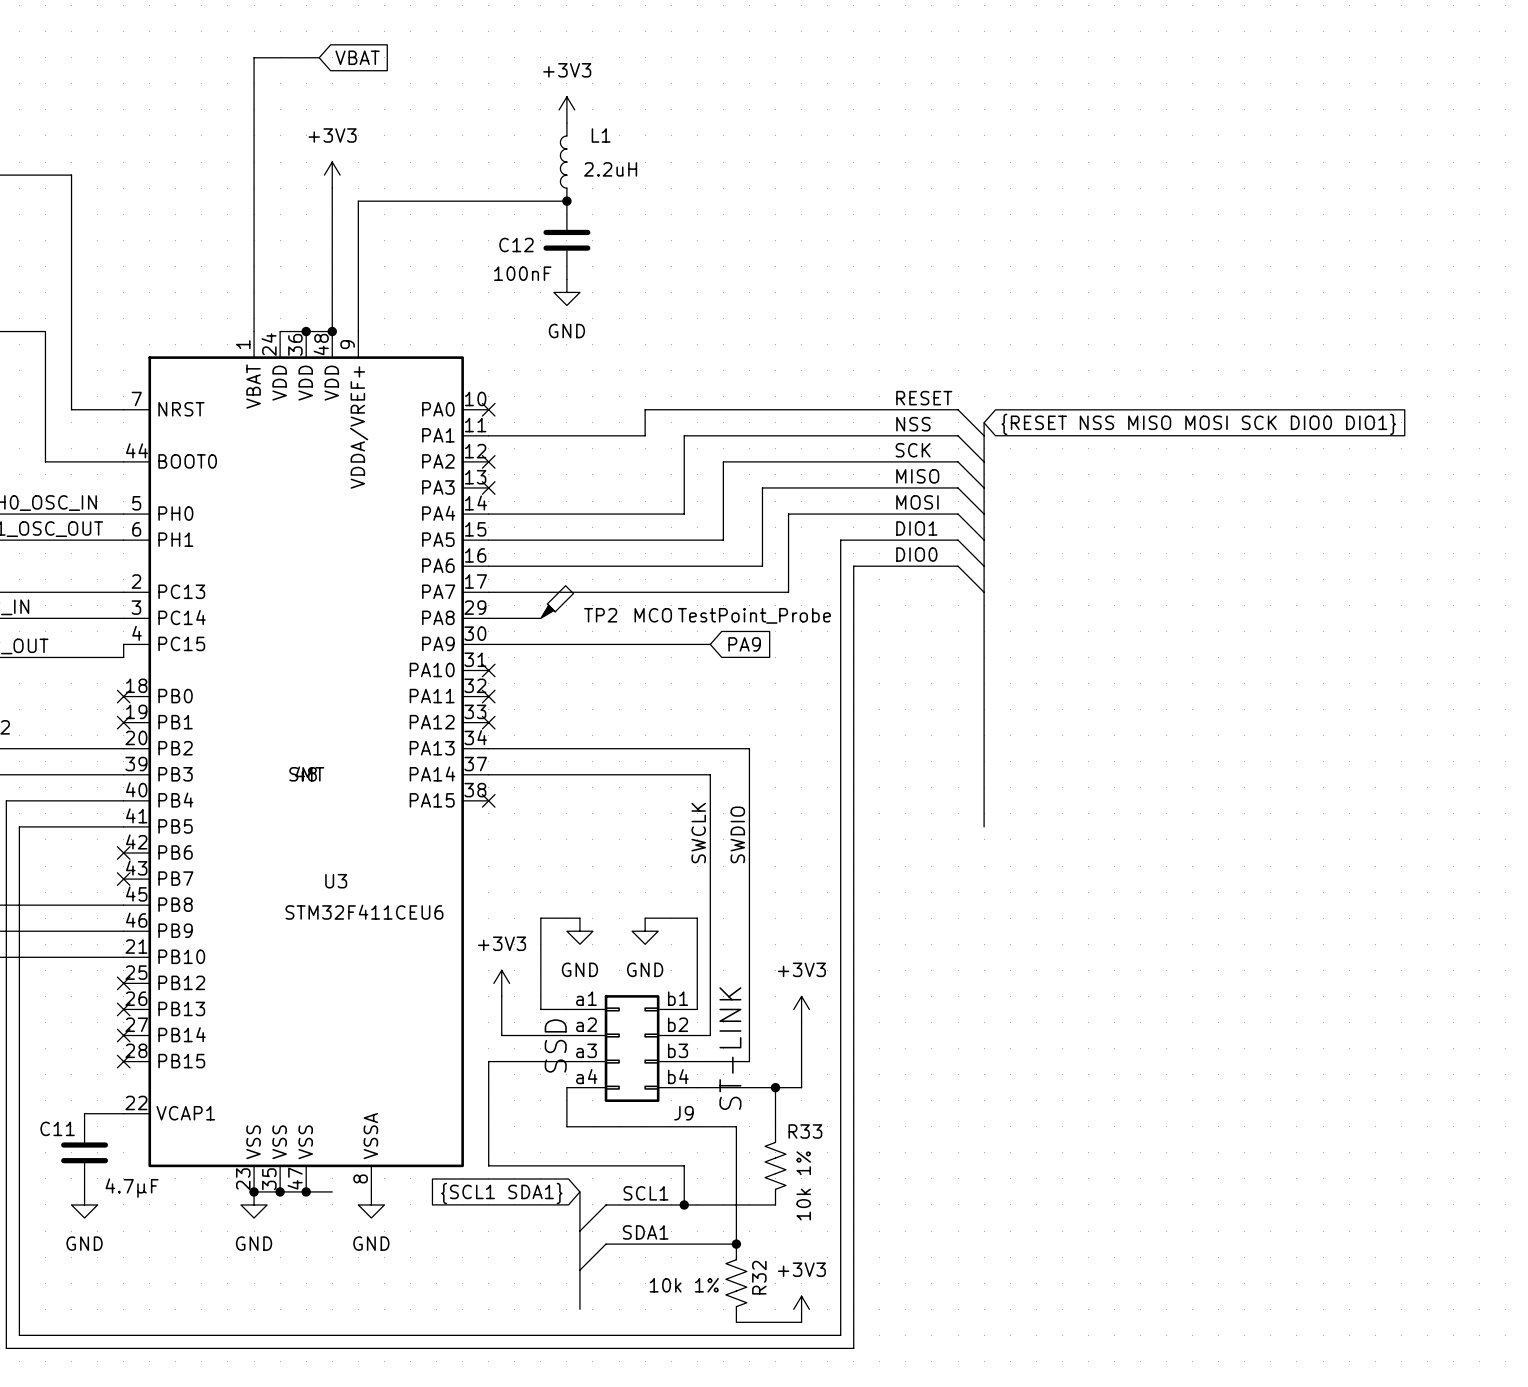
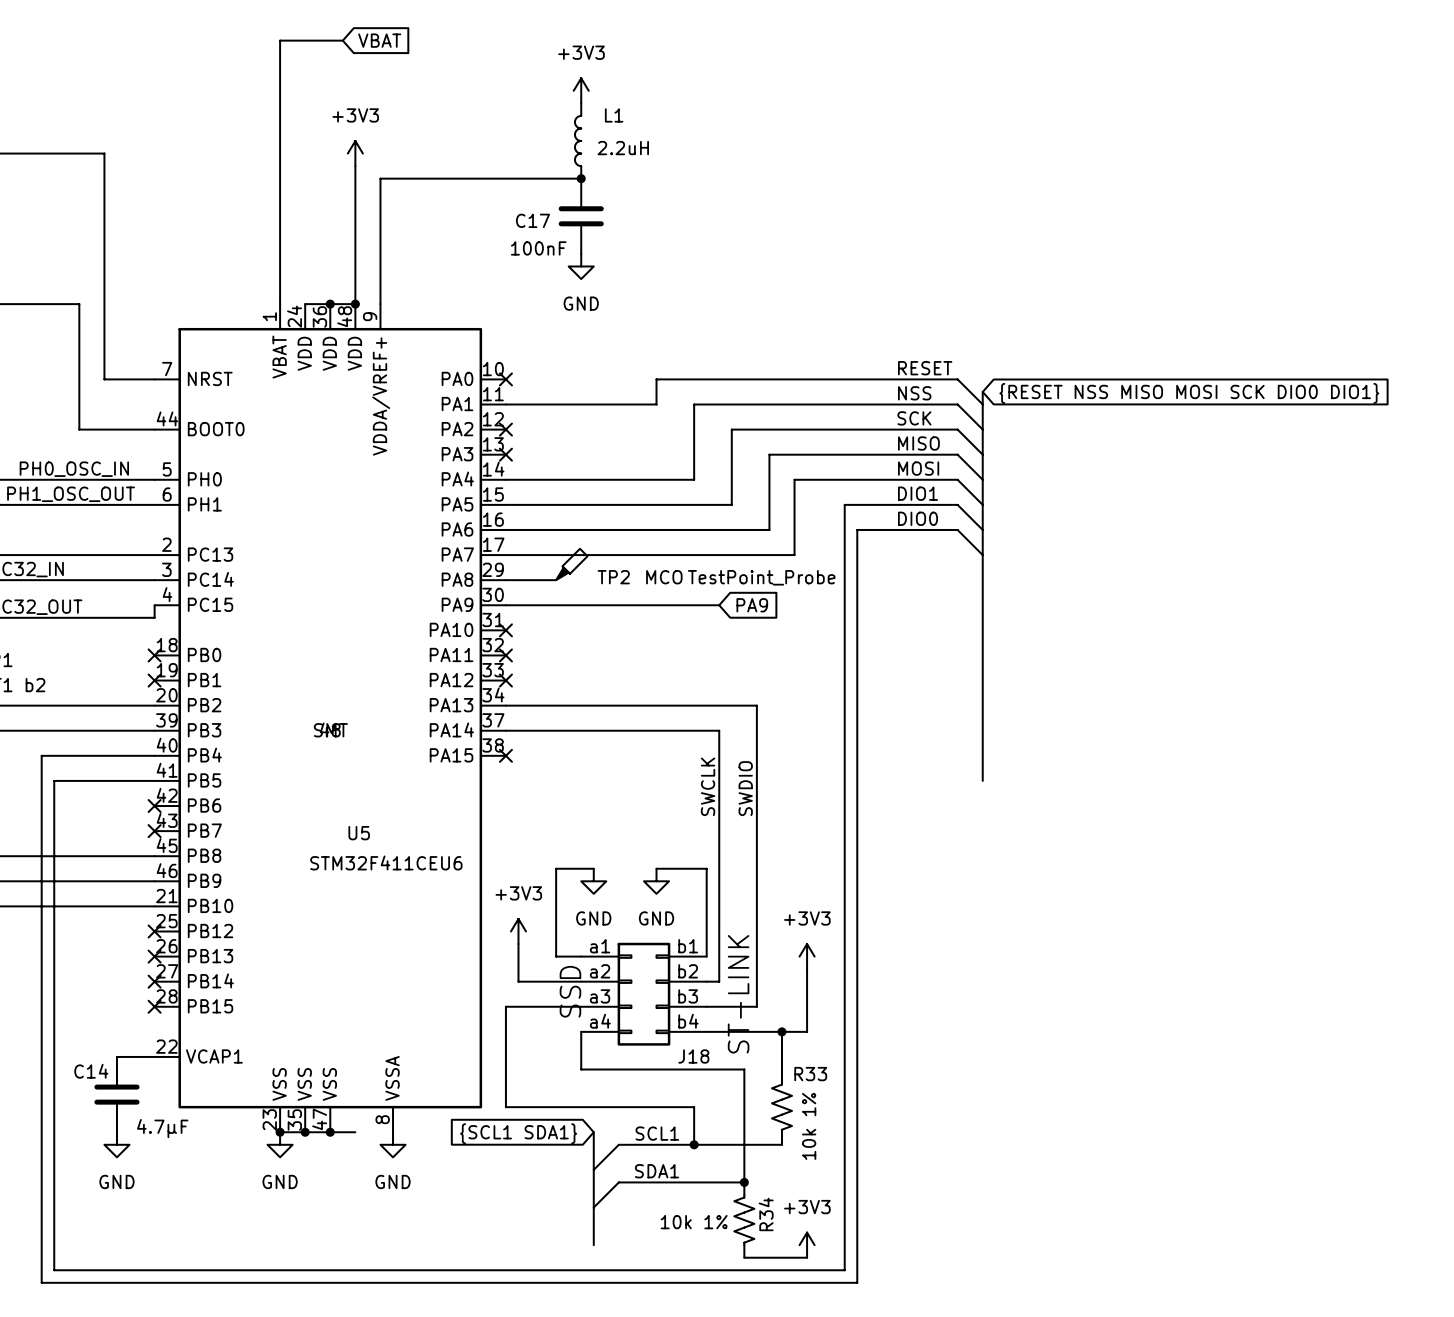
C12 name: C12 (516, 245) -> C17 (532, 220)
U3 name: U3 (336, 881) -> U5 (359, 833)
J9 name: J9 (683, 1113) -> J18 (693, 1056)
C11 name: C11 (57, 1128) -> C14 (91, 1071)
R32 name: R32 (759, 1277) -> R34 (766, 1214)

